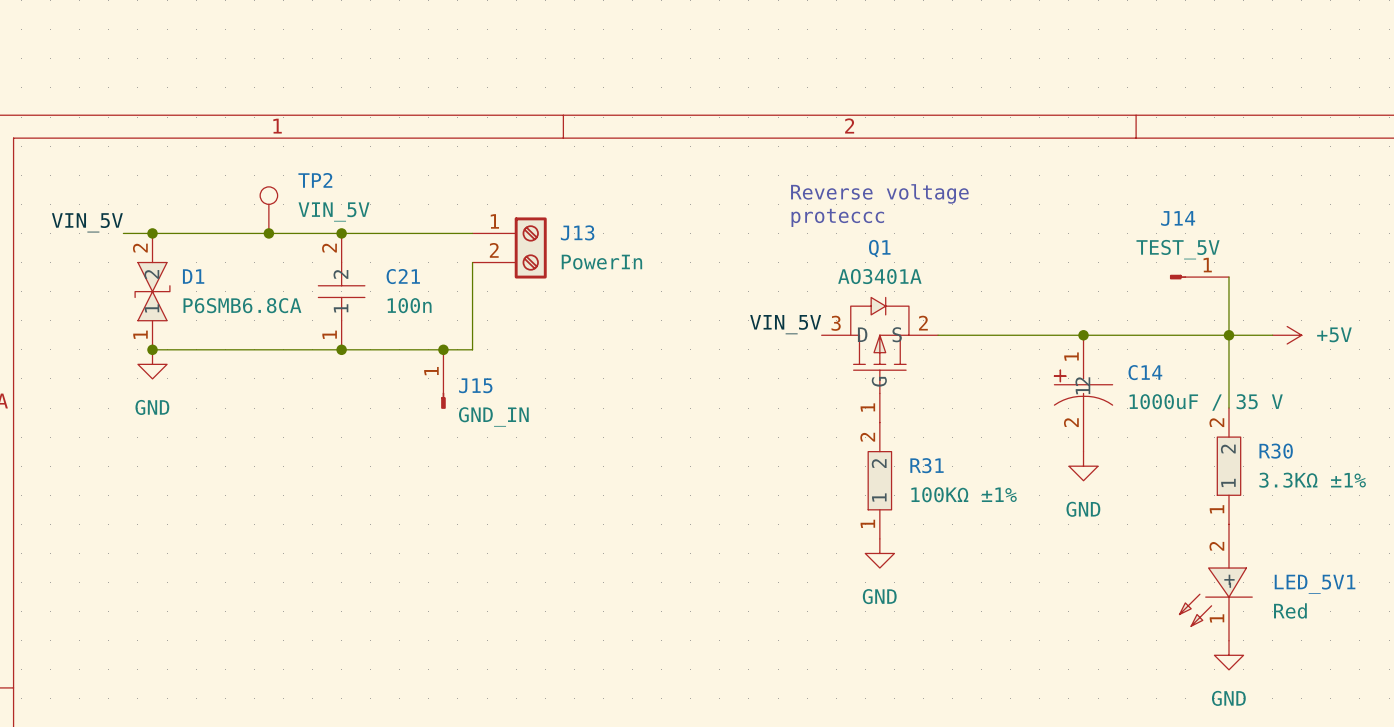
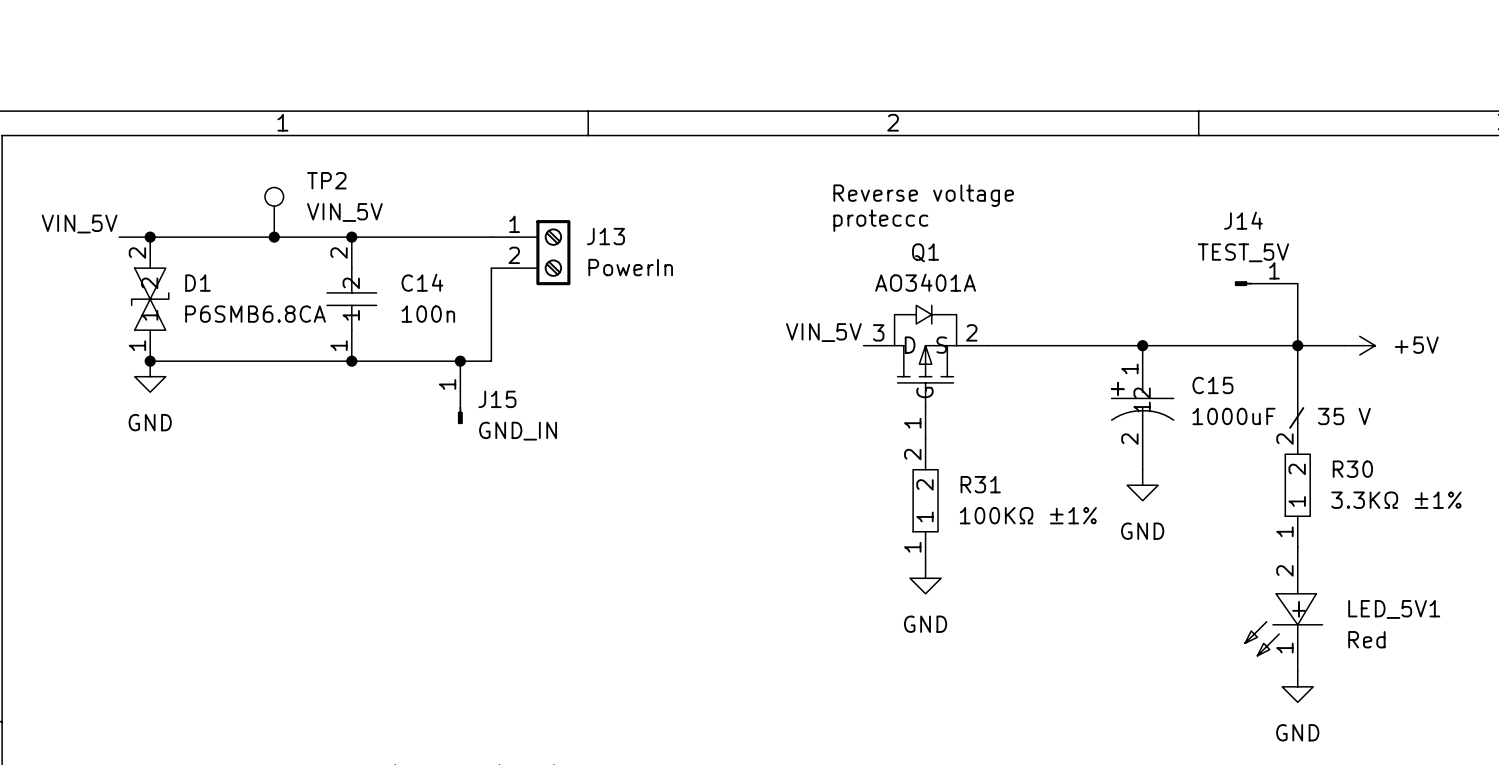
C21 name: C21 (403, 276) -> C14 (422, 282)
C14 name: C14 (1145, 372) -> C15 (1212, 385)

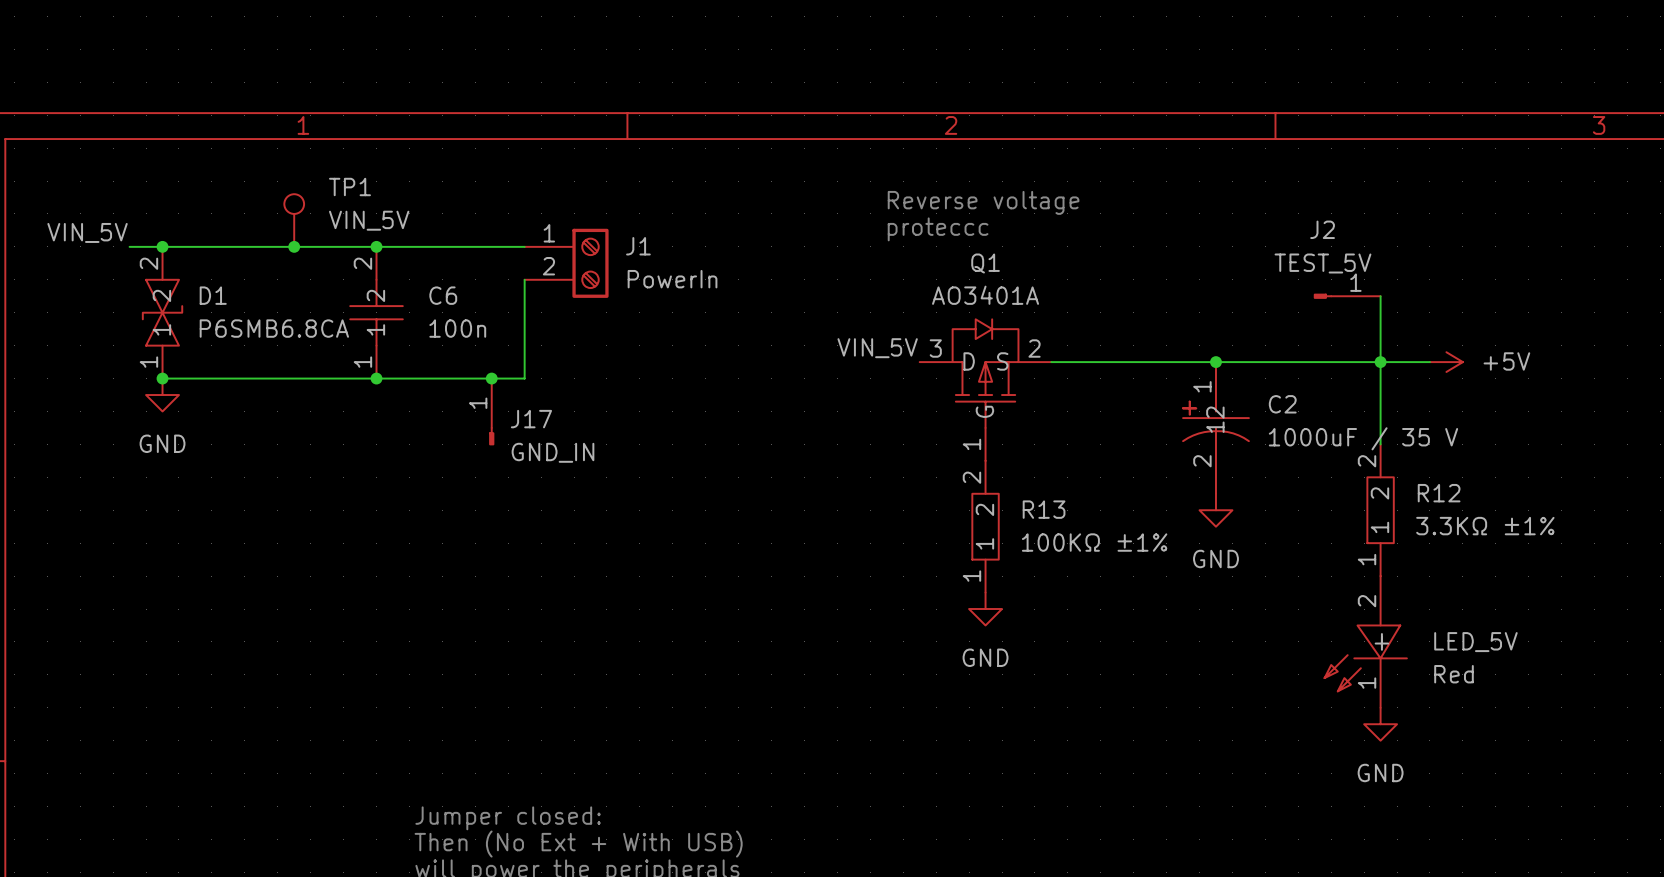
TP2 name: TP2 (326, 180) -> TP1 (349, 186)
J14 name: J14 (1243, 220) -> J2 (1322, 229)
J13 name: J13 (605, 236) -> J1 (638, 246)
C14 name: C14 (422, 282) -> C6 (443, 295)
C15 name: C15 (1212, 385) -> C2 (1282, 404)
J15 name: J15 (497, 399) -> J17 (531, 419)
R30 name: R30 (1352, 469) -> R12 (1439, 493)
R31 name: R31 (980, 484) -> R13 (1044, 509)
LED_5V1 name: LED_5V1 (1394, 609) -> LED_5V (1475, 642)

